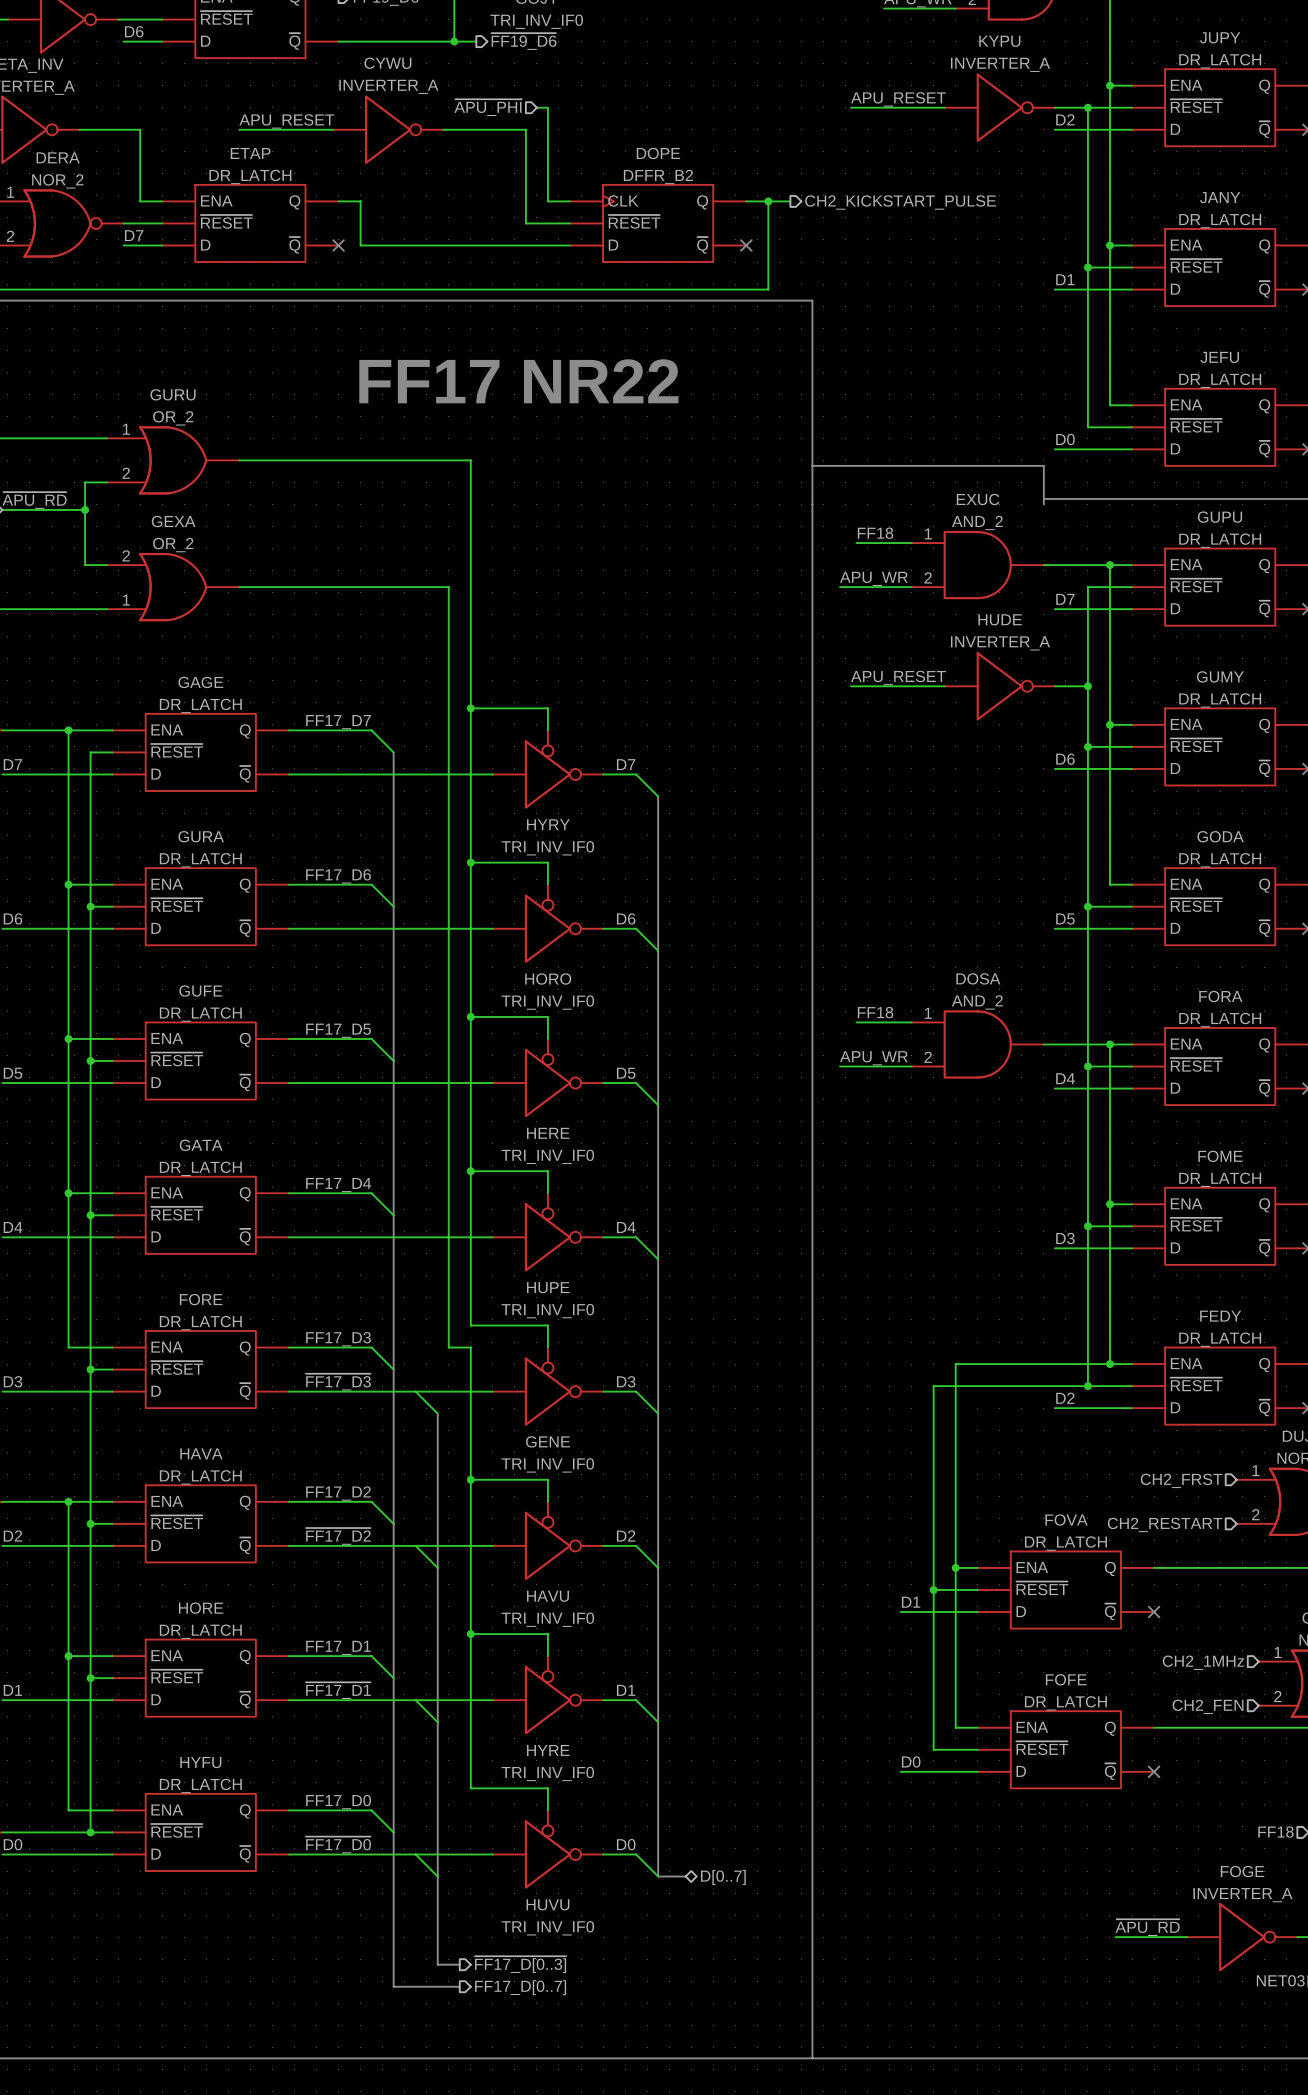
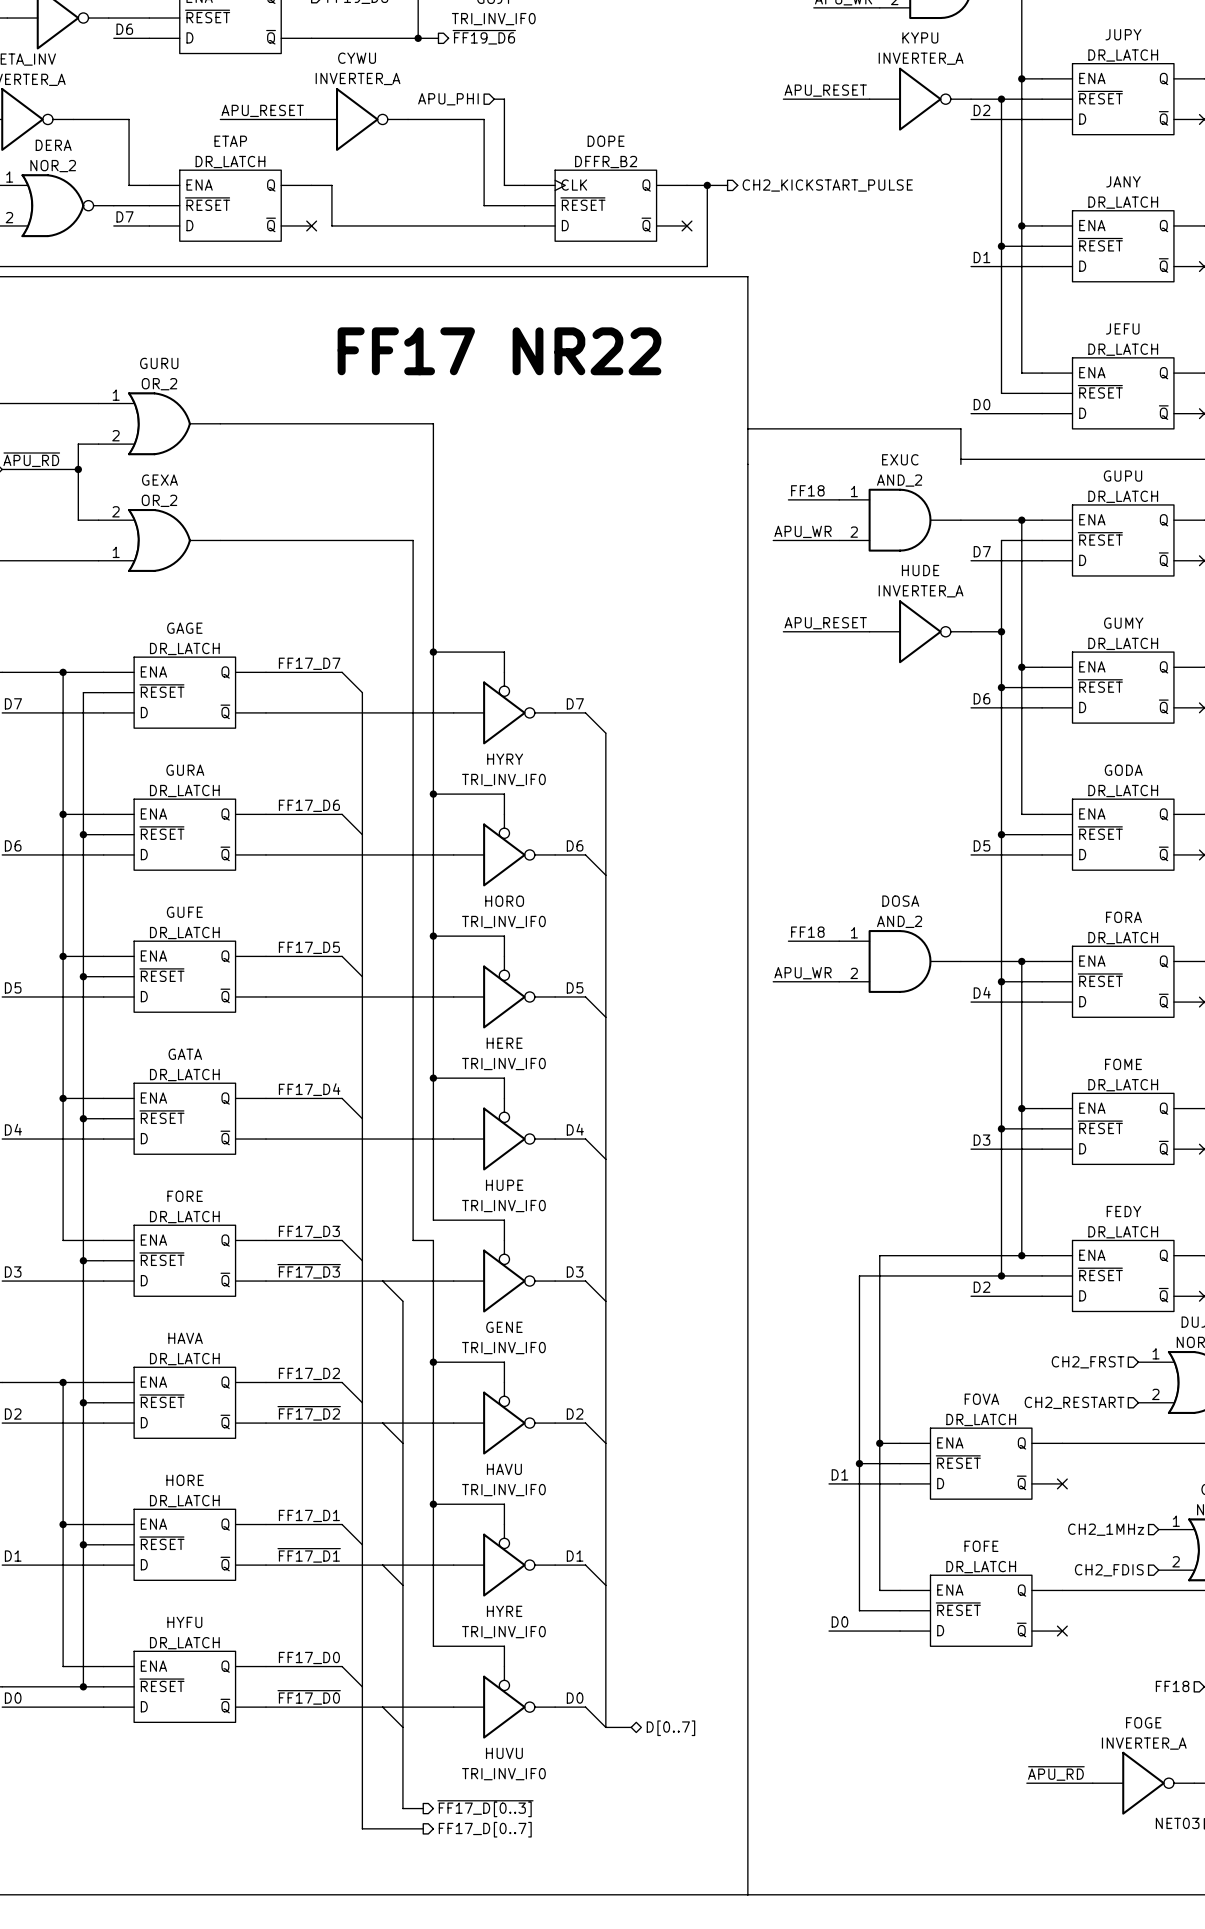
hierarchical label: ~{APU_PHI} (488, 107) -> APU_PHI (448, 99)
hierarchical label: CH2_FEN (1208, 1706) -> CH2_FDIS (1109, 1570)

